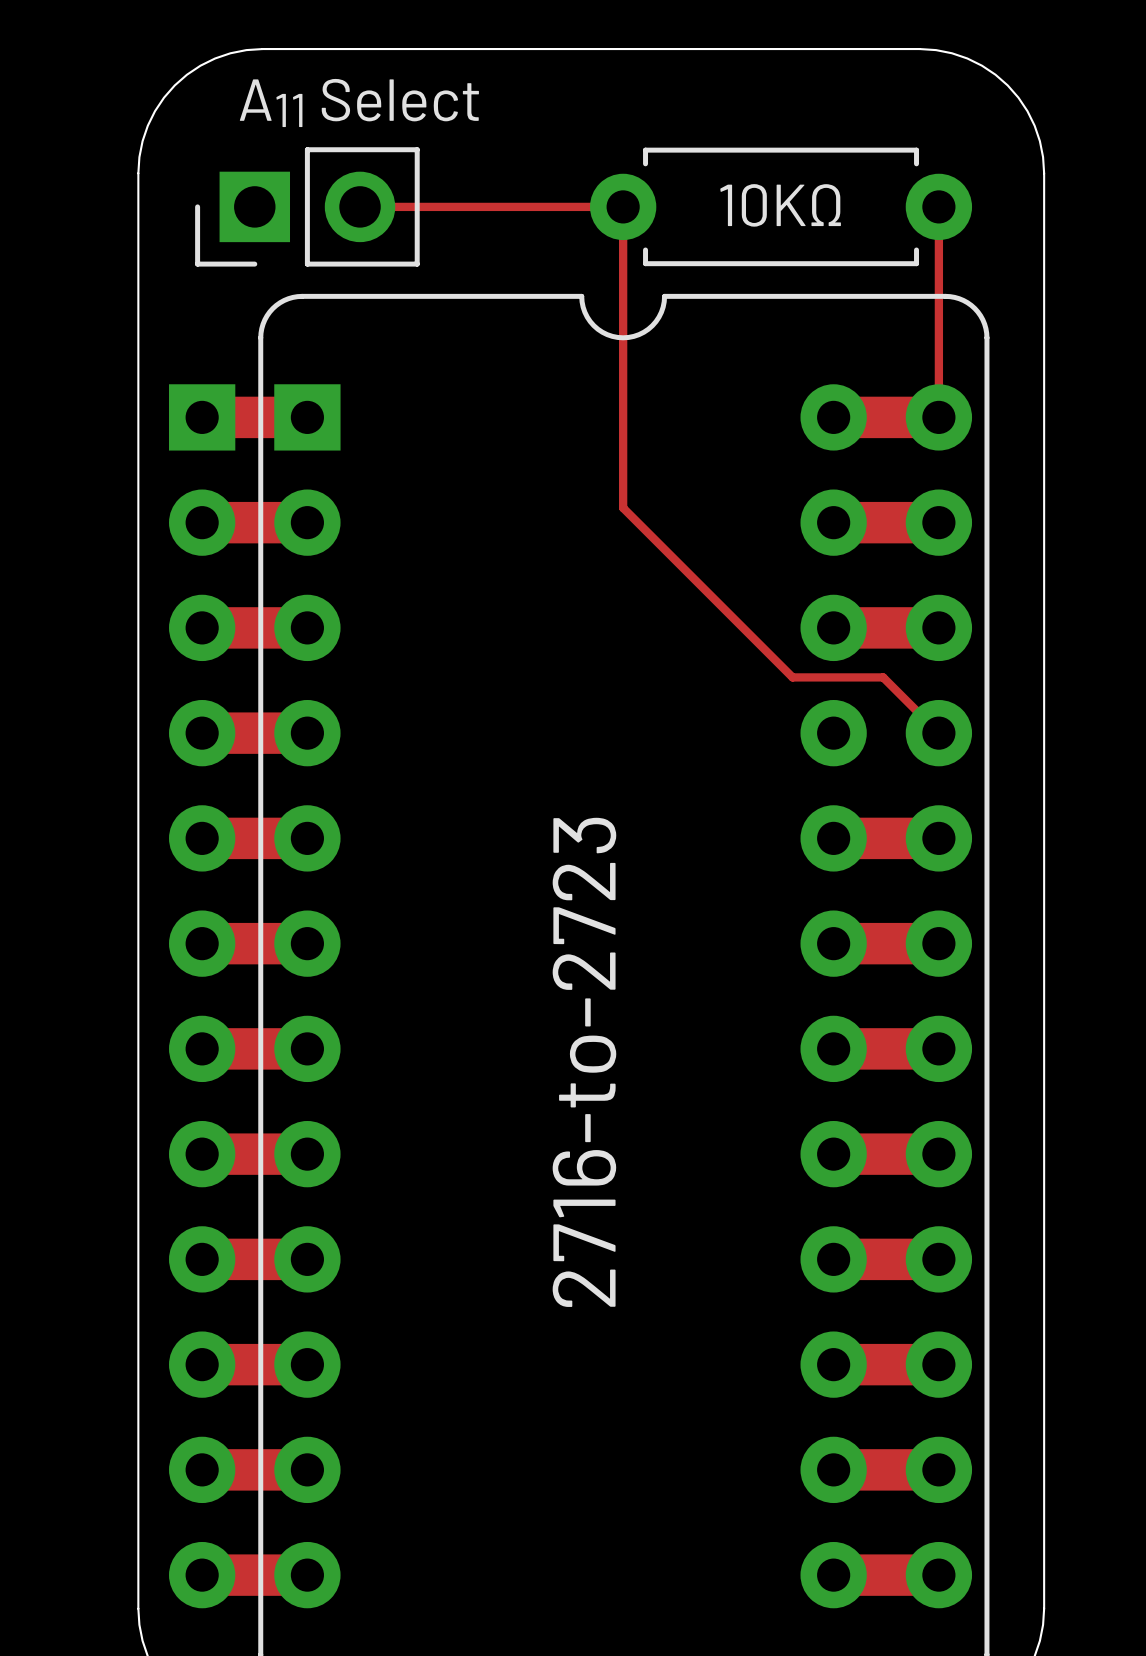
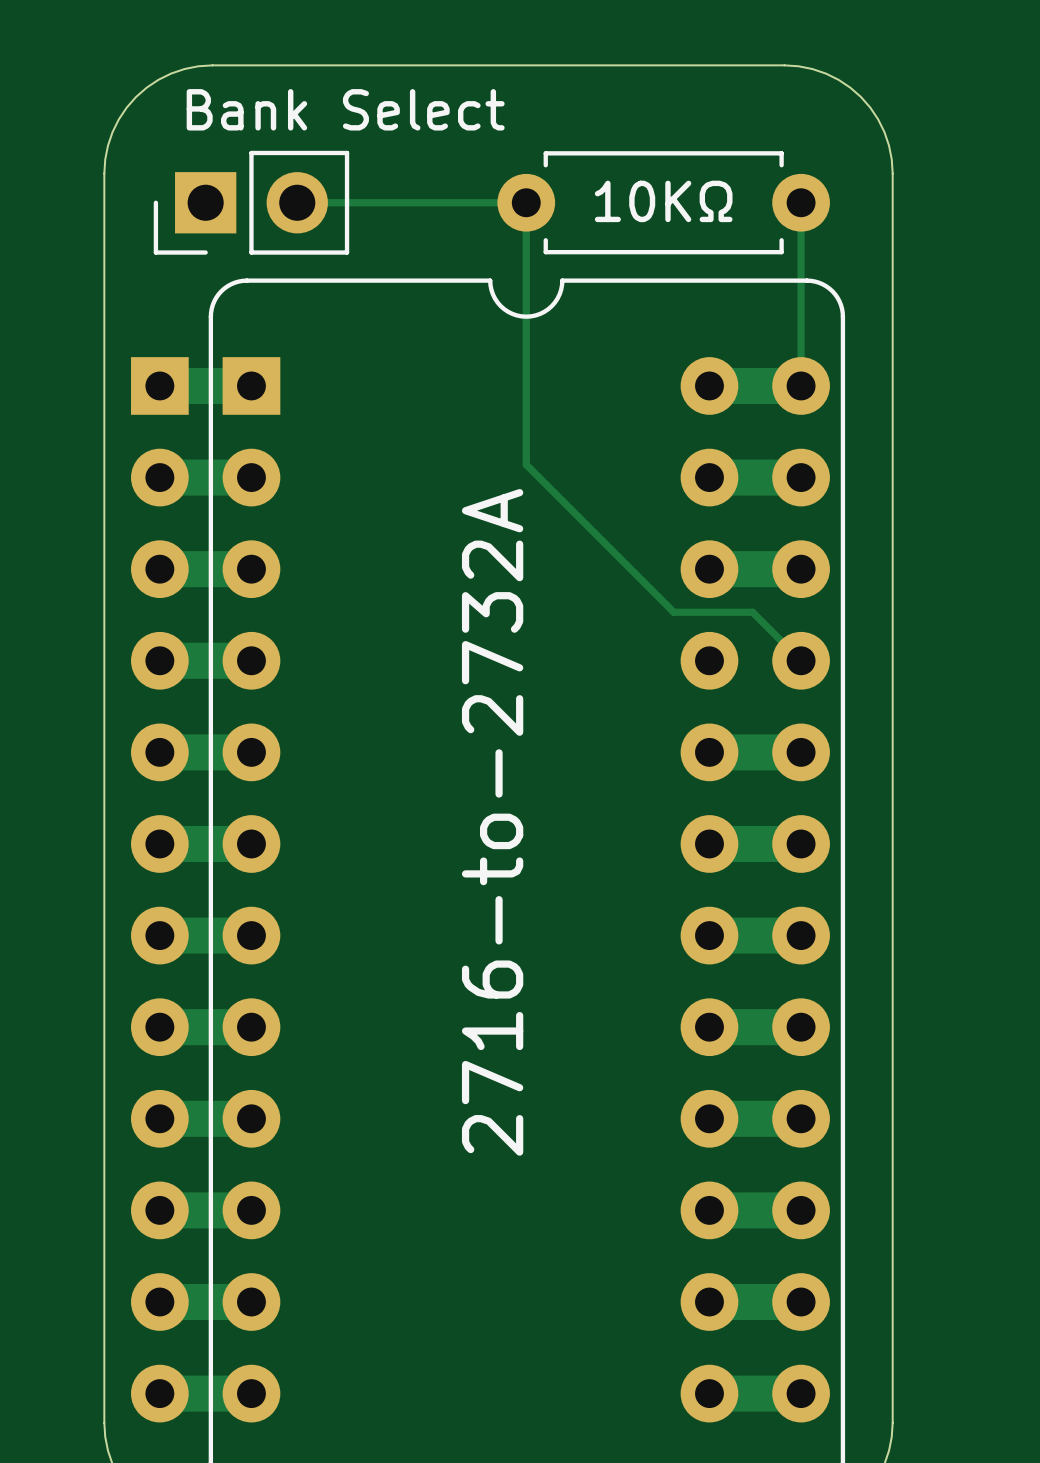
part value: A11 Select (359, 102) -> Bank Select (345, 109)
text: 2716-to-2723 (584, 1062) -> 2716-to-2732A (492, 822)

